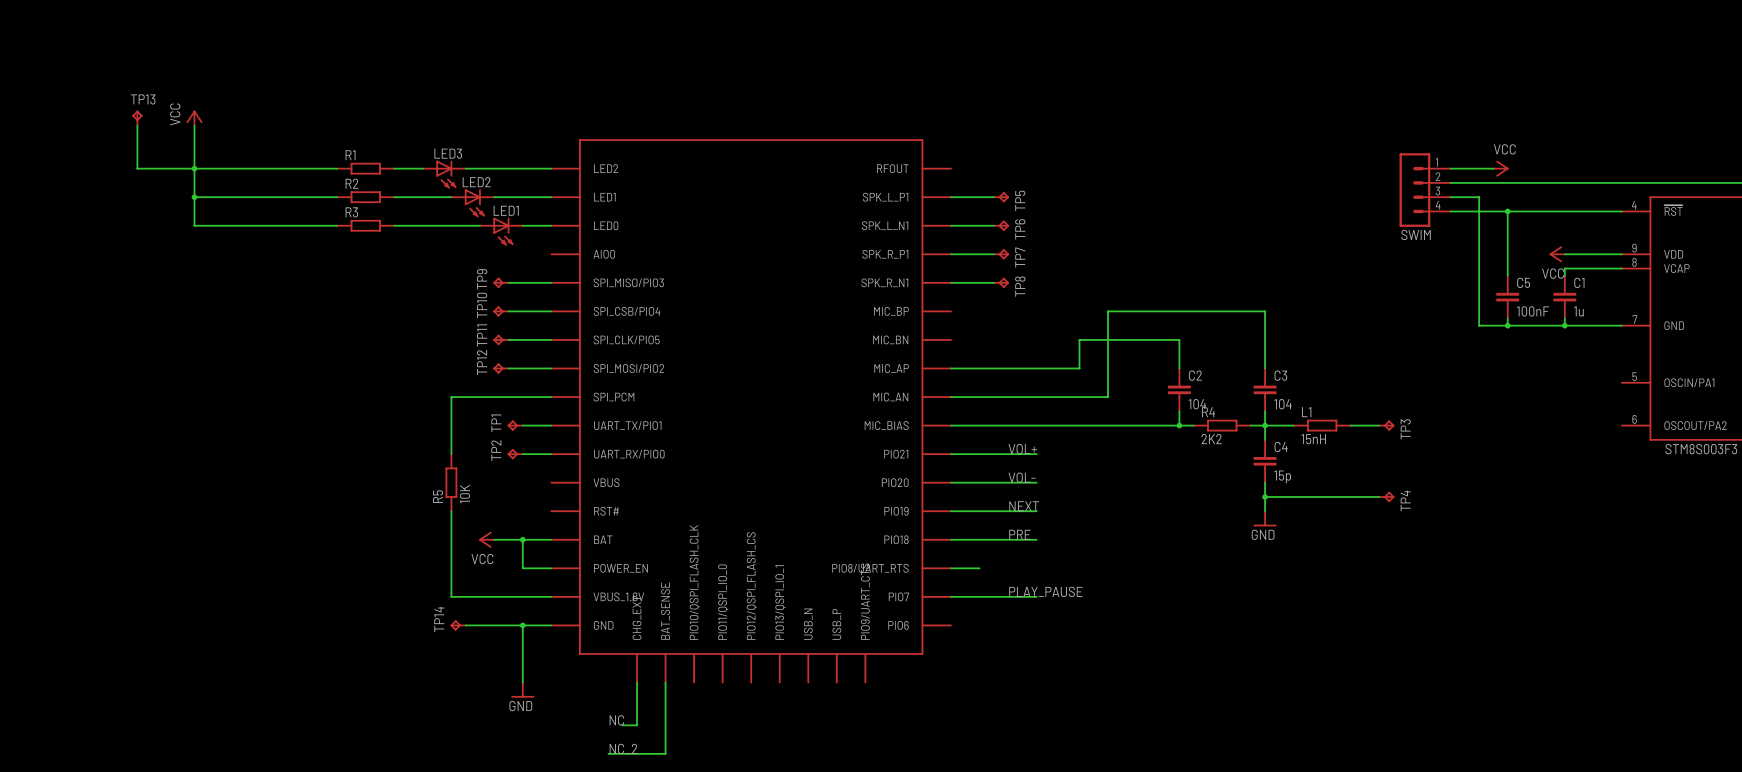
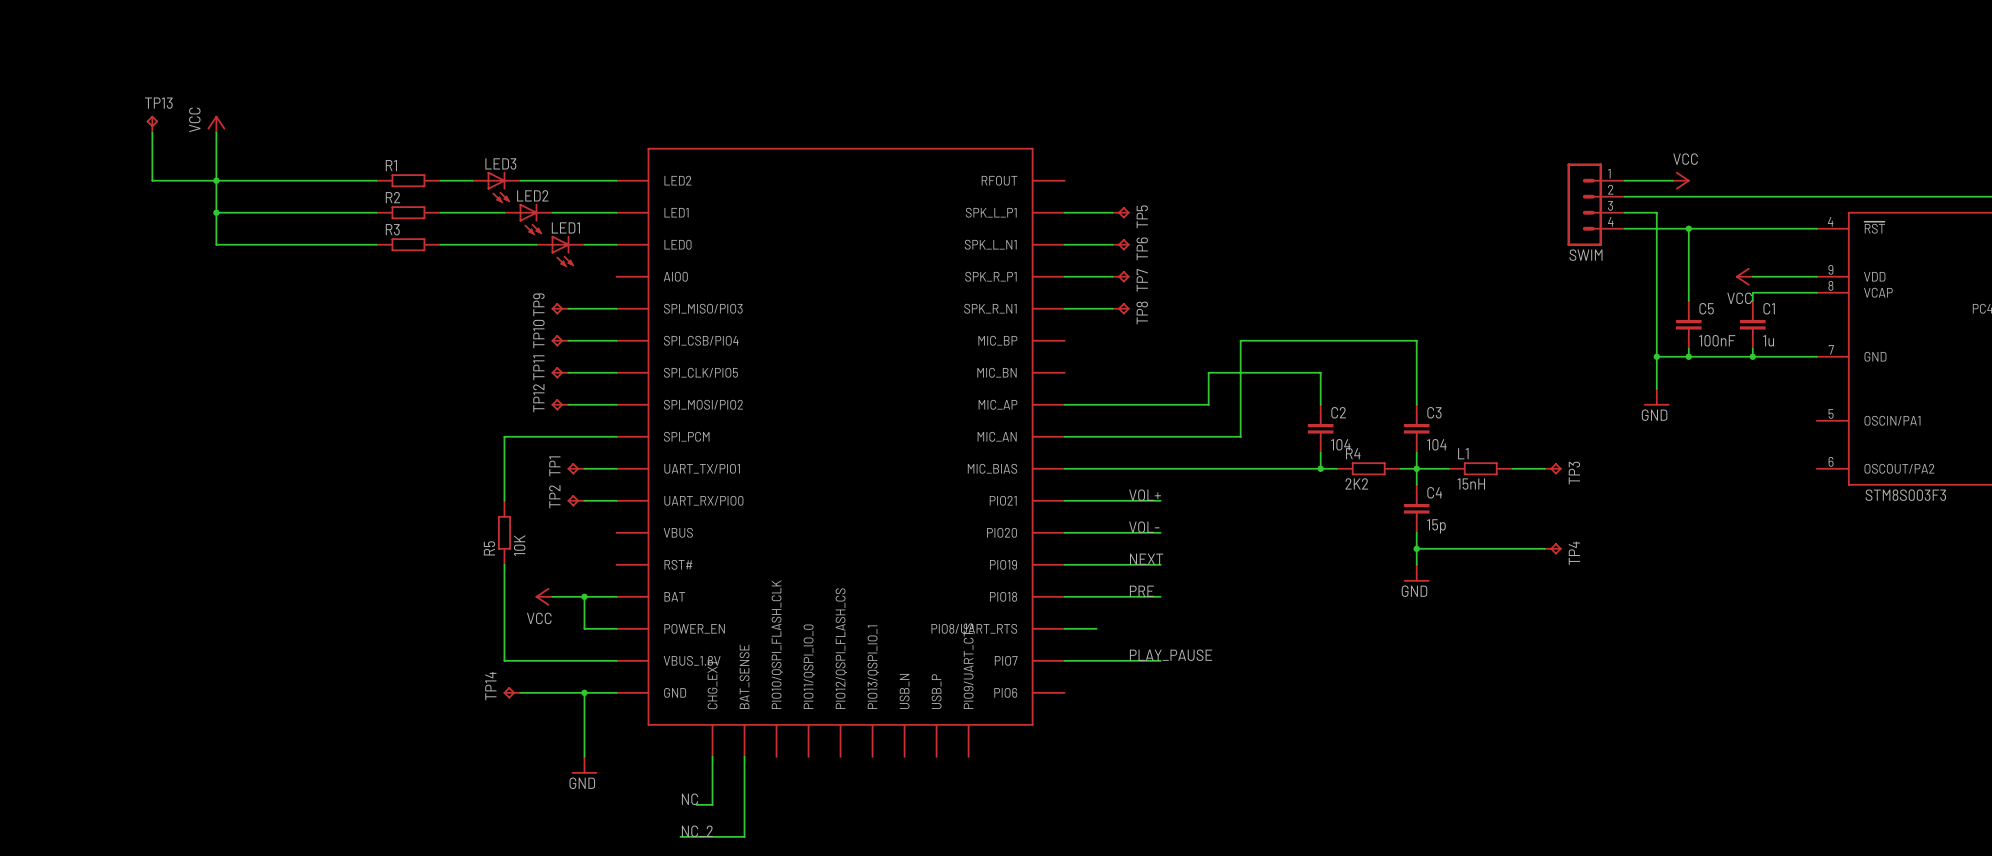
wire: none -> (1656, 356) (1656, 388)
junction: none -> (1656, 356)
power symbol: none -> GND (1656, 397)

